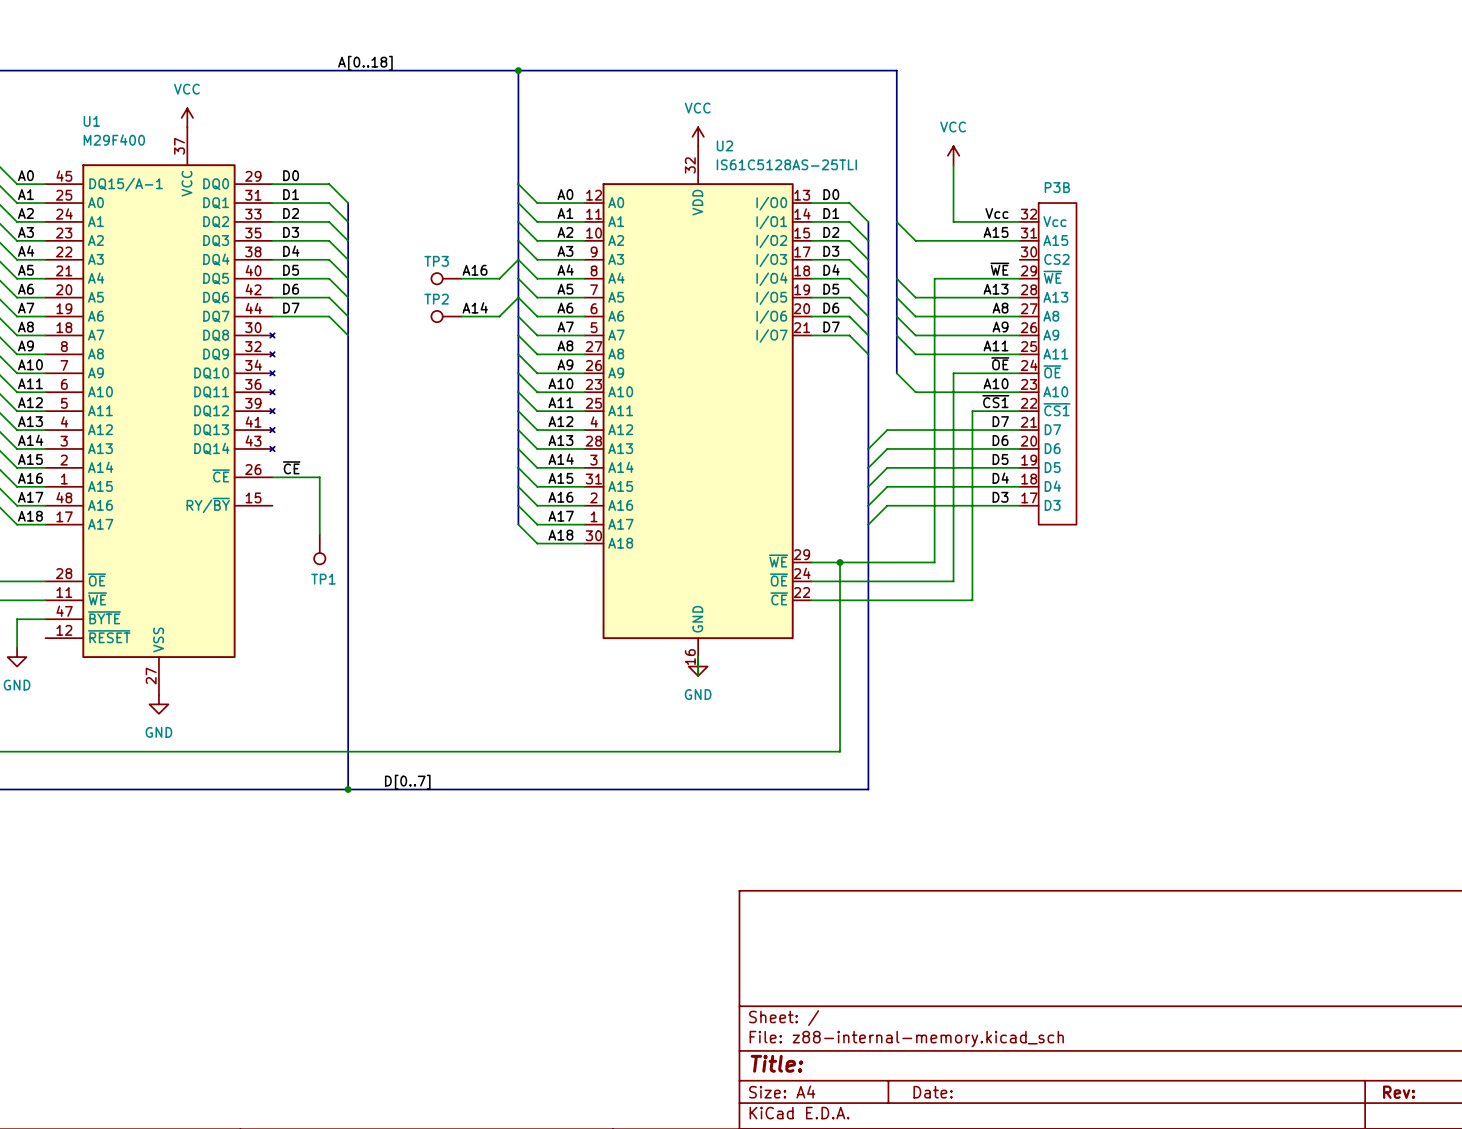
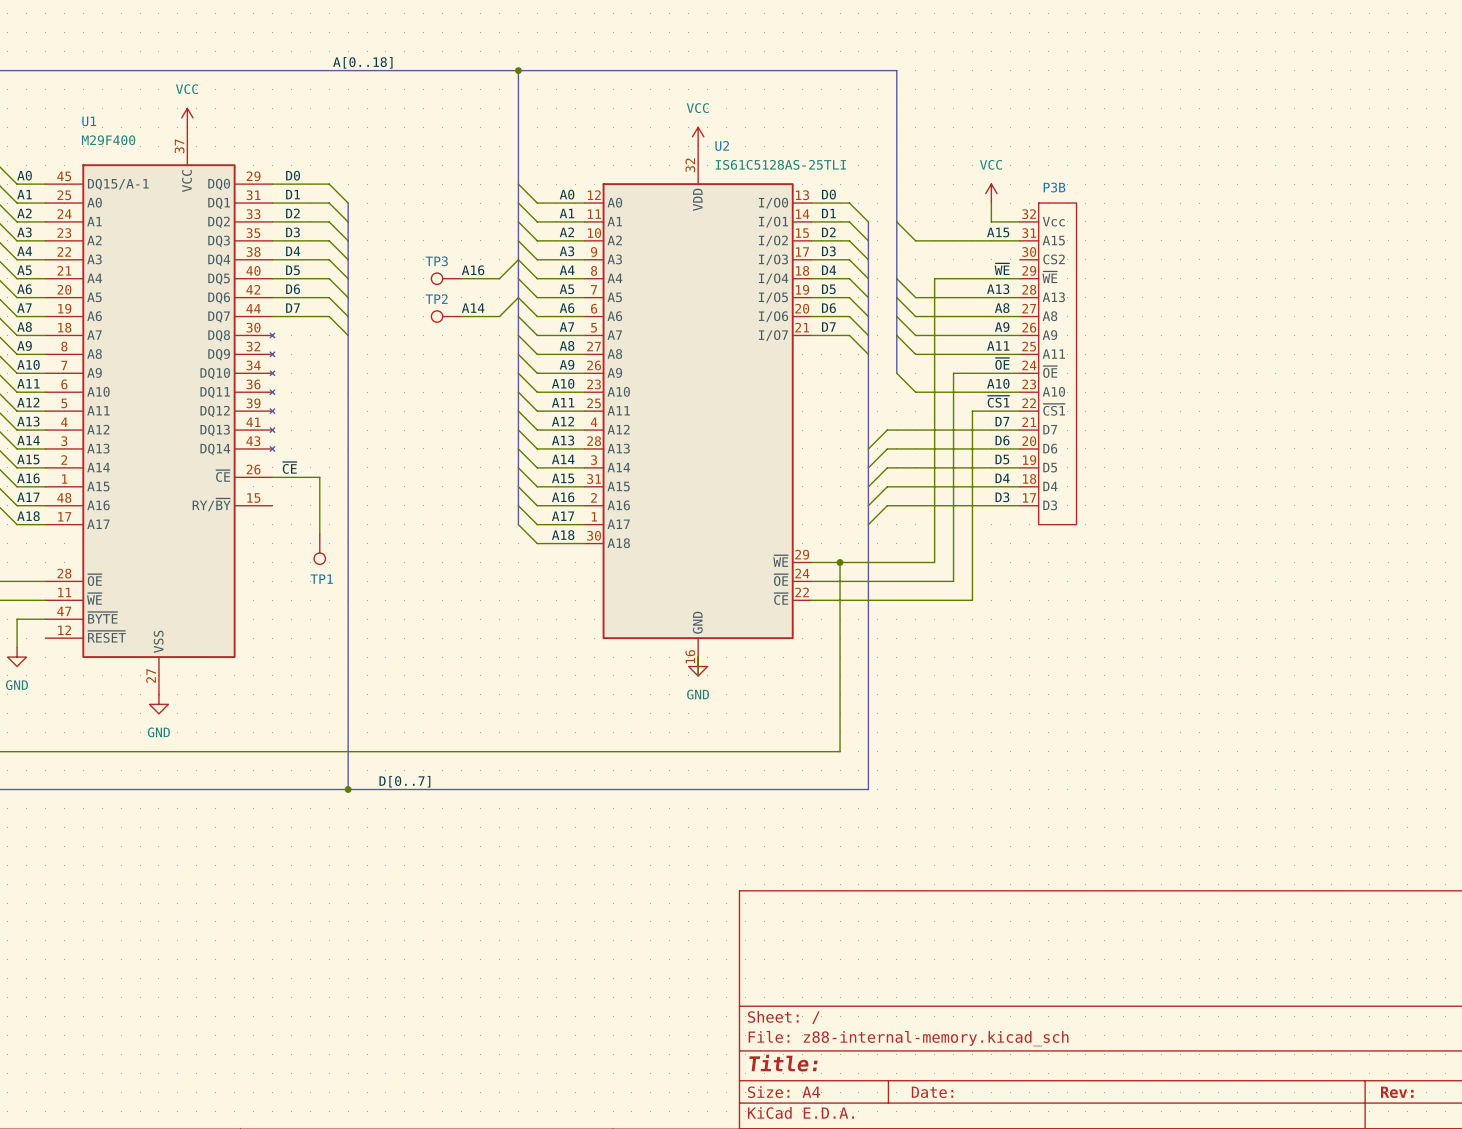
power symbol position: VCC (953, 155) -> VCC (991, 193)
wire: (953, 165) (953, 221) (991, 221) -> (991, 203) (991, 221)
label: Vcc (996, 213) -> none

